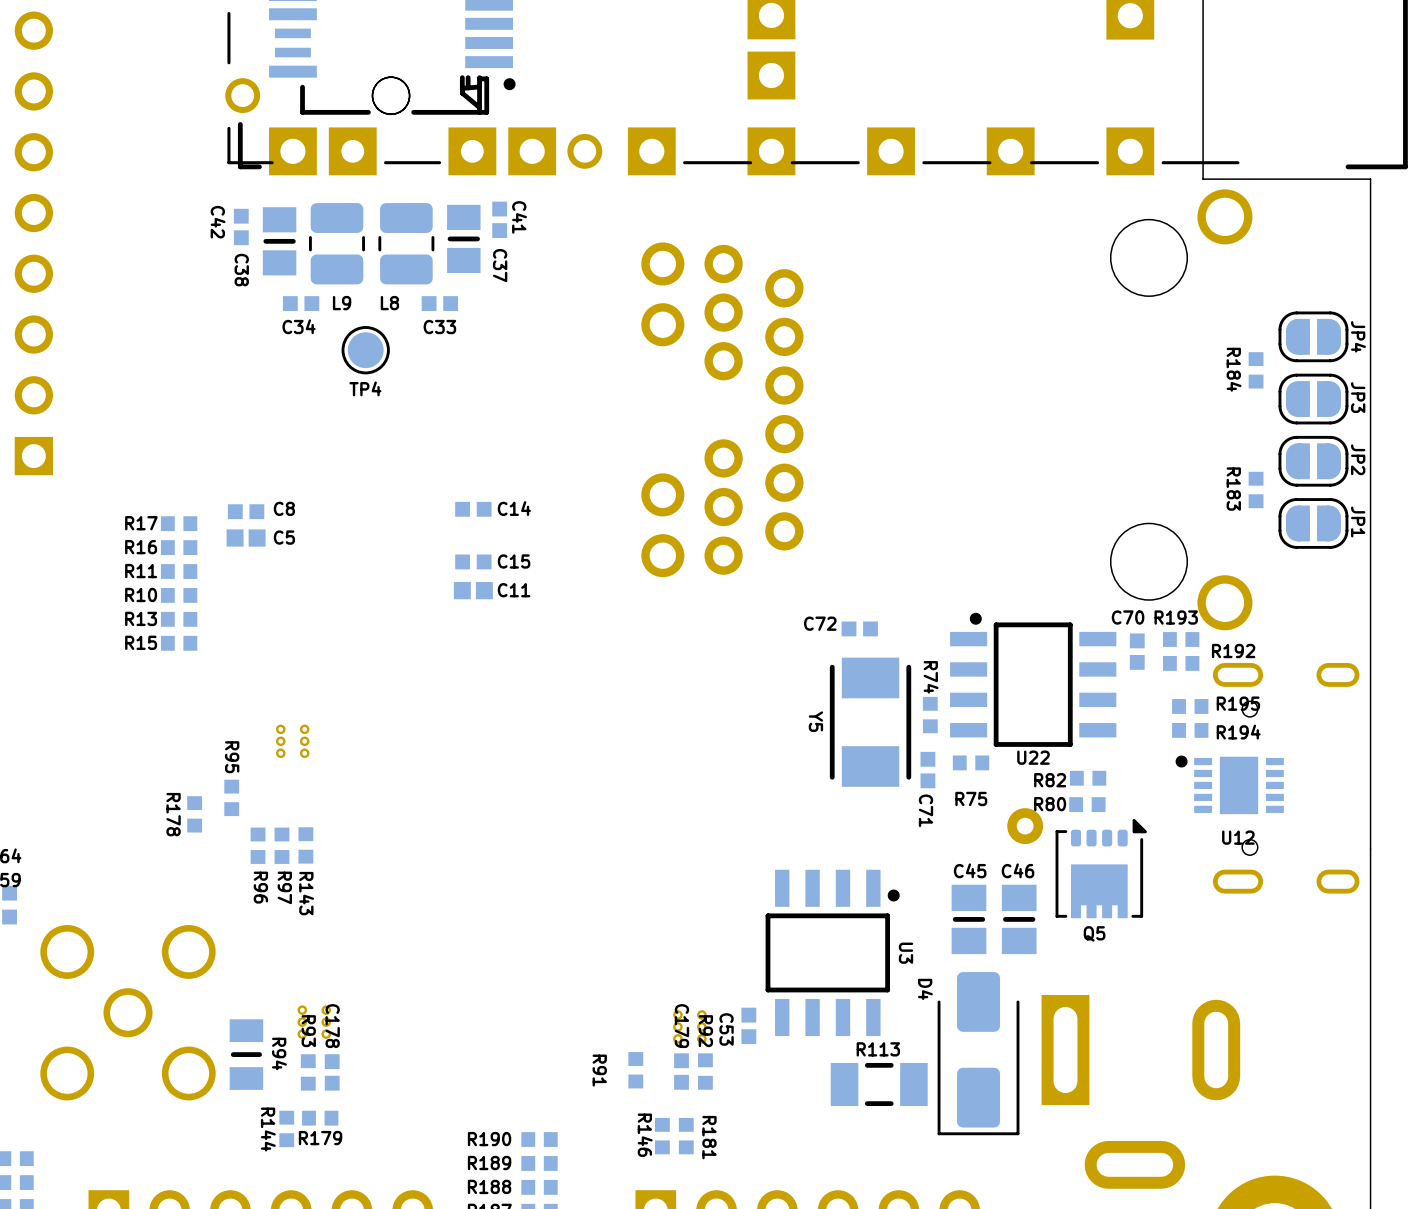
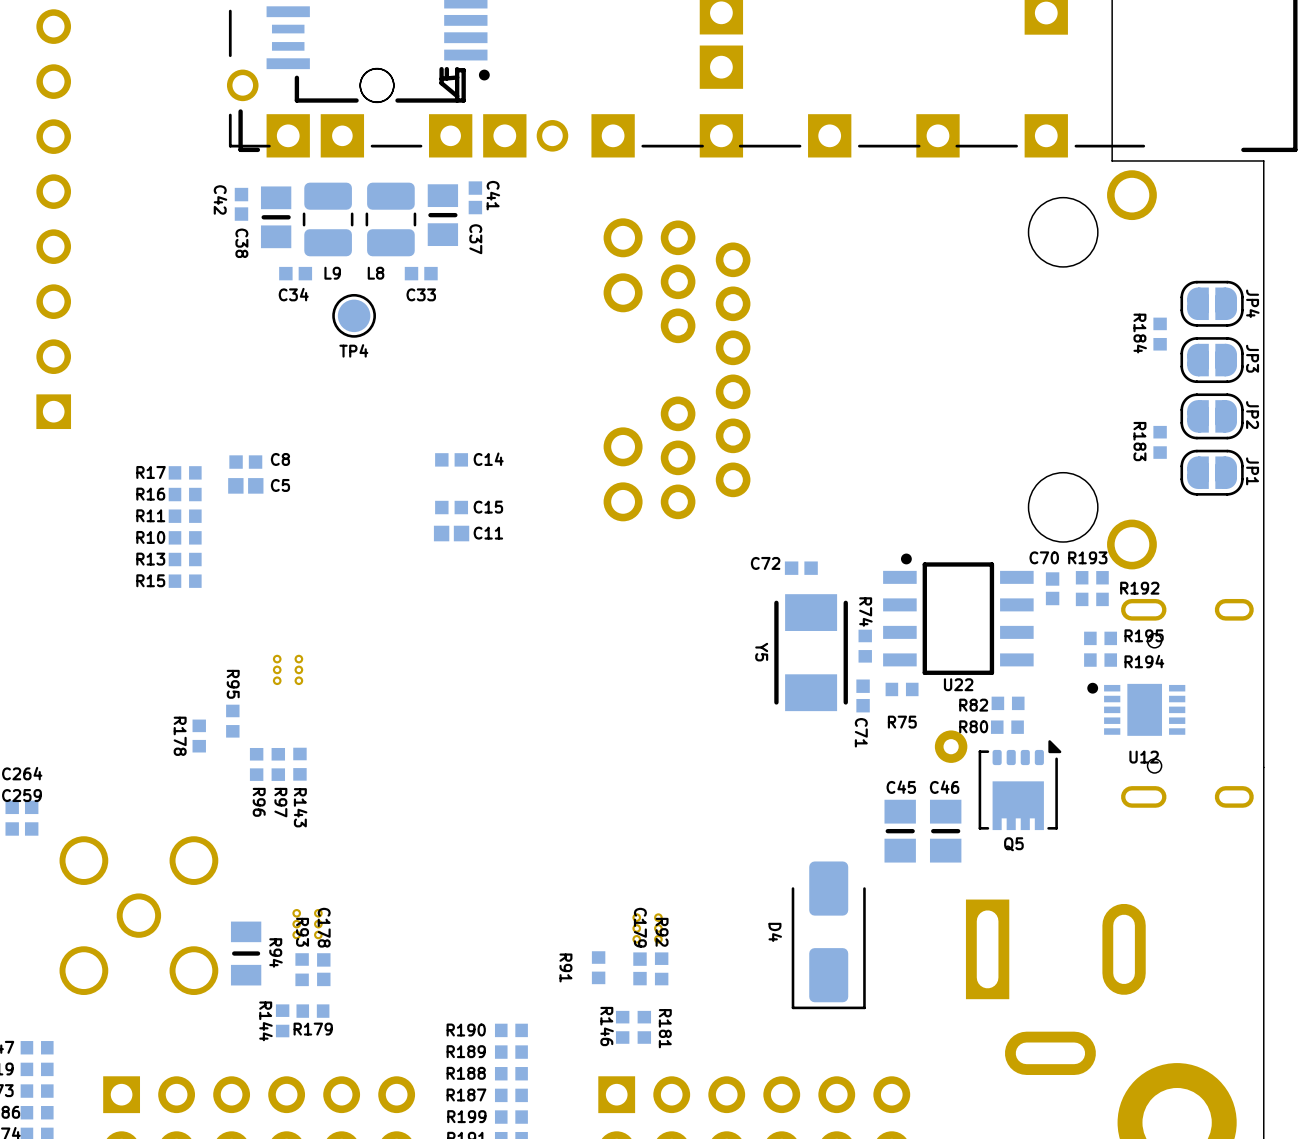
U3: (832, 952) -> none
D4 name position: D4 (925, 989) -> D4 (775, 932)
C53: (748, 1025) -> none
D4 position: (978, 1053) -> (828, 935)
R113: (879, 1084) -> none

